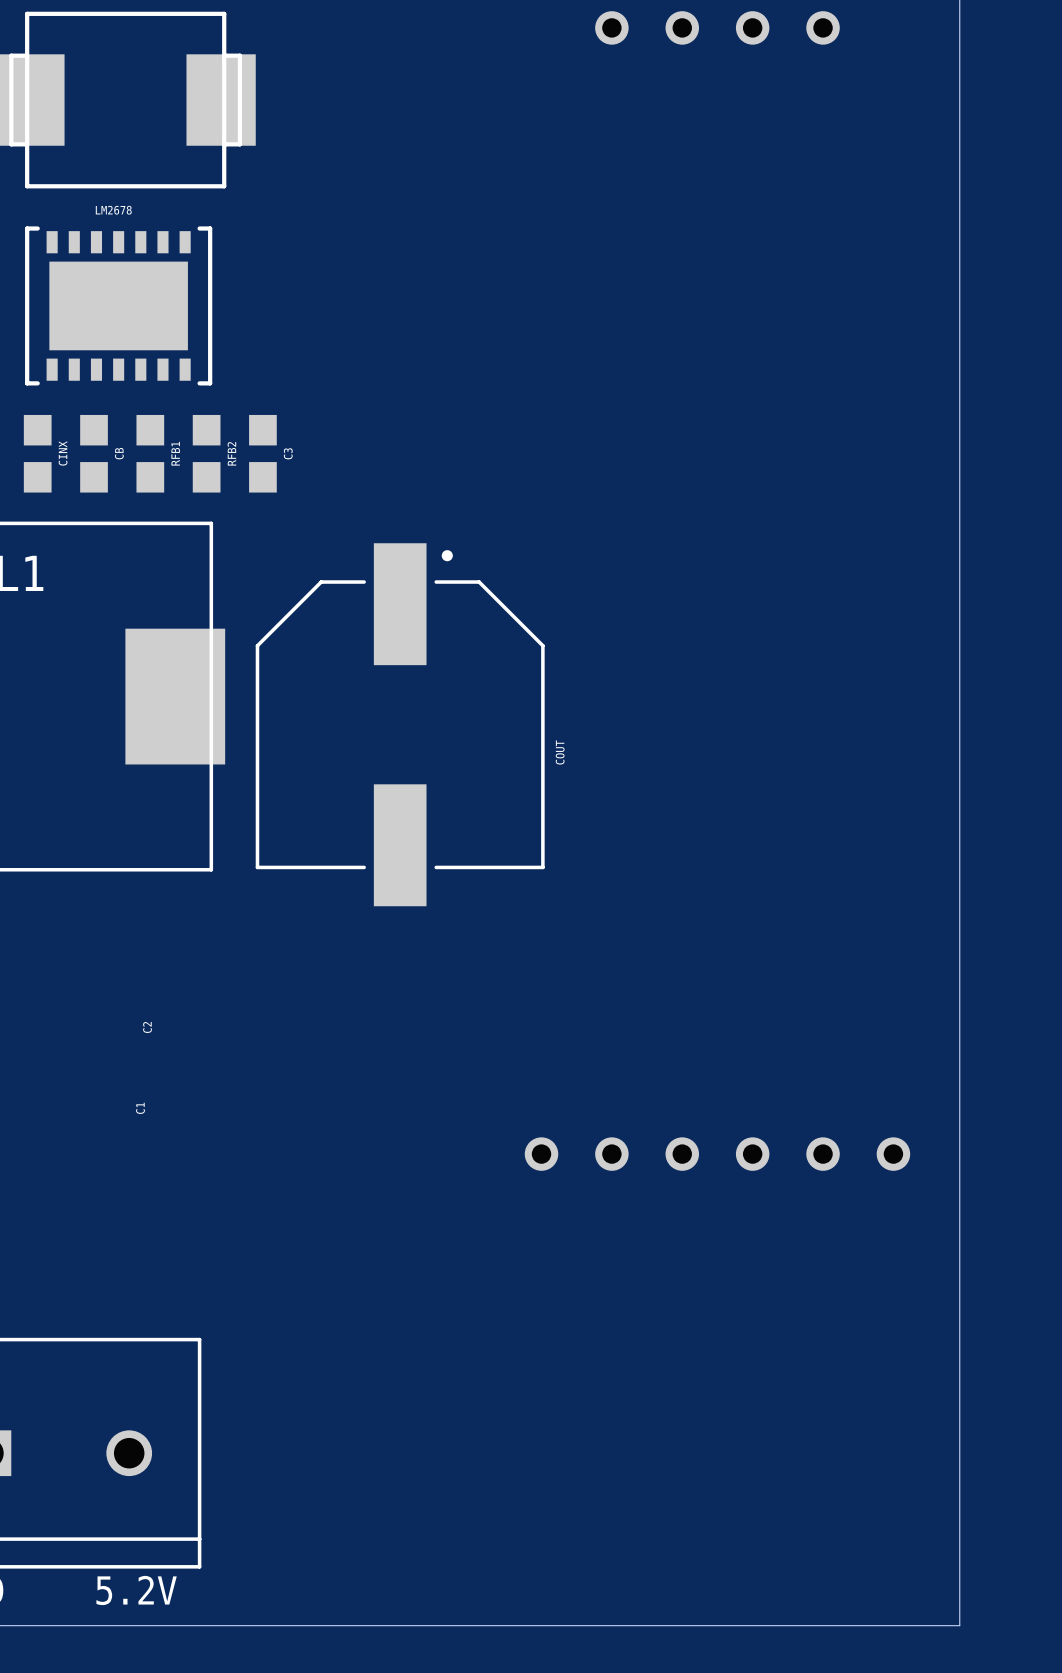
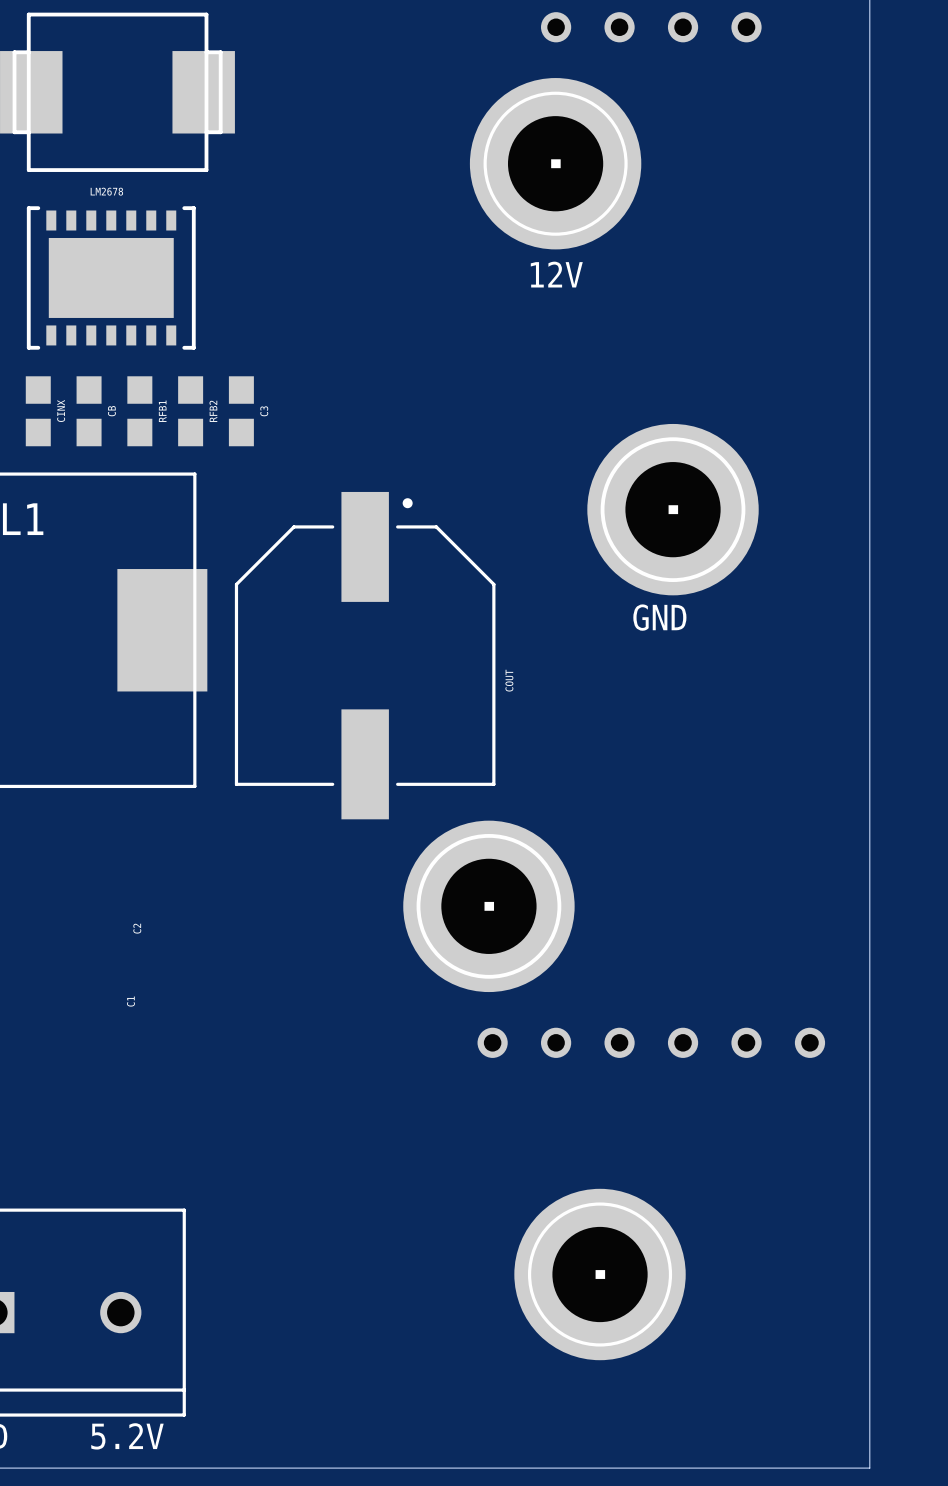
part: none -> (555, 163)
text: none -> 12V (556, 274)
part: none -> (673, 509)
text: none -> GND (659, 617)
part: none -> (488, 906)
part: none -> (600, 1274)

